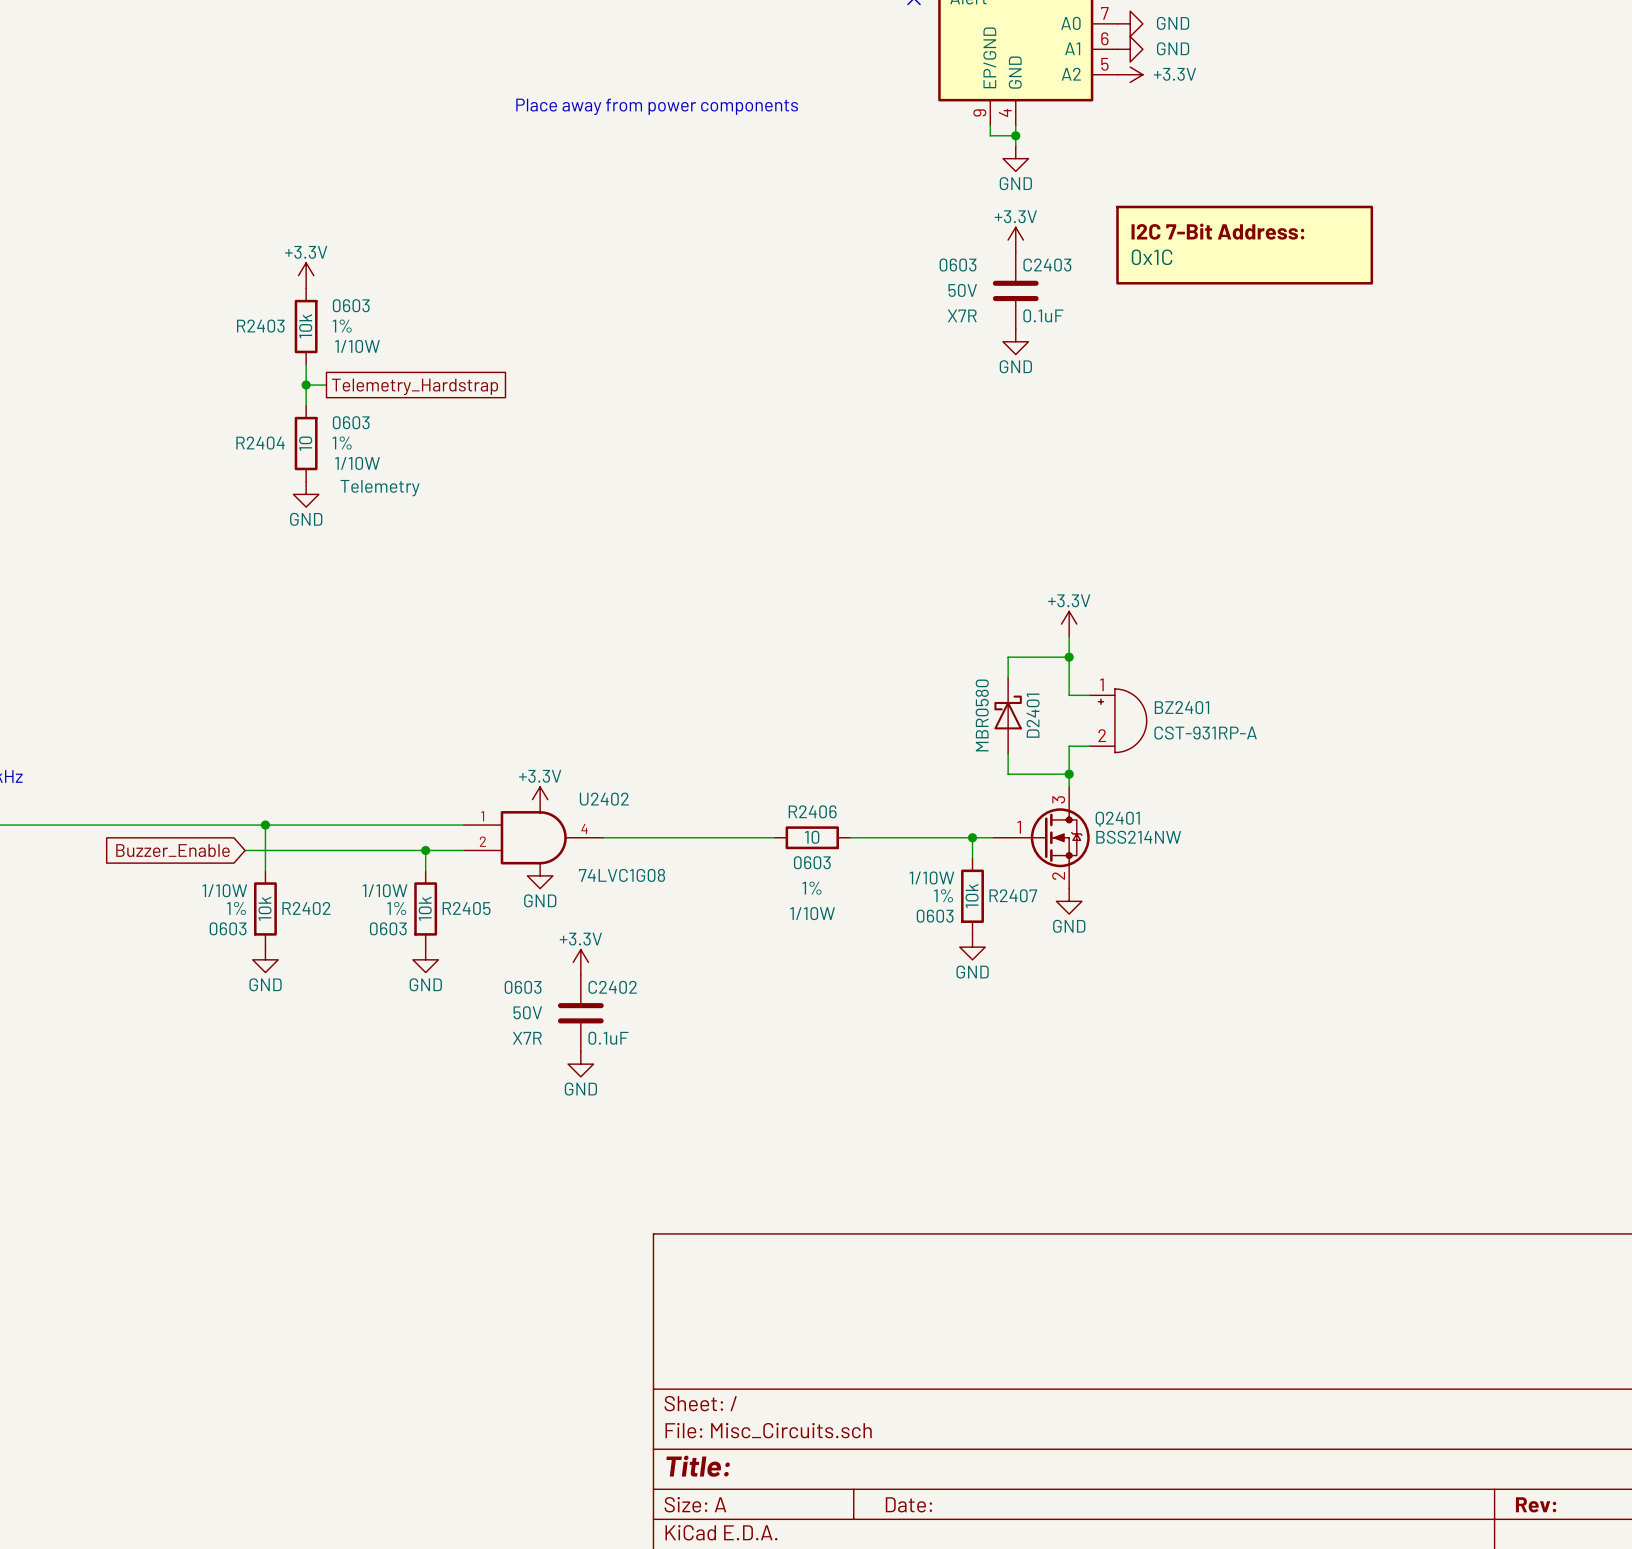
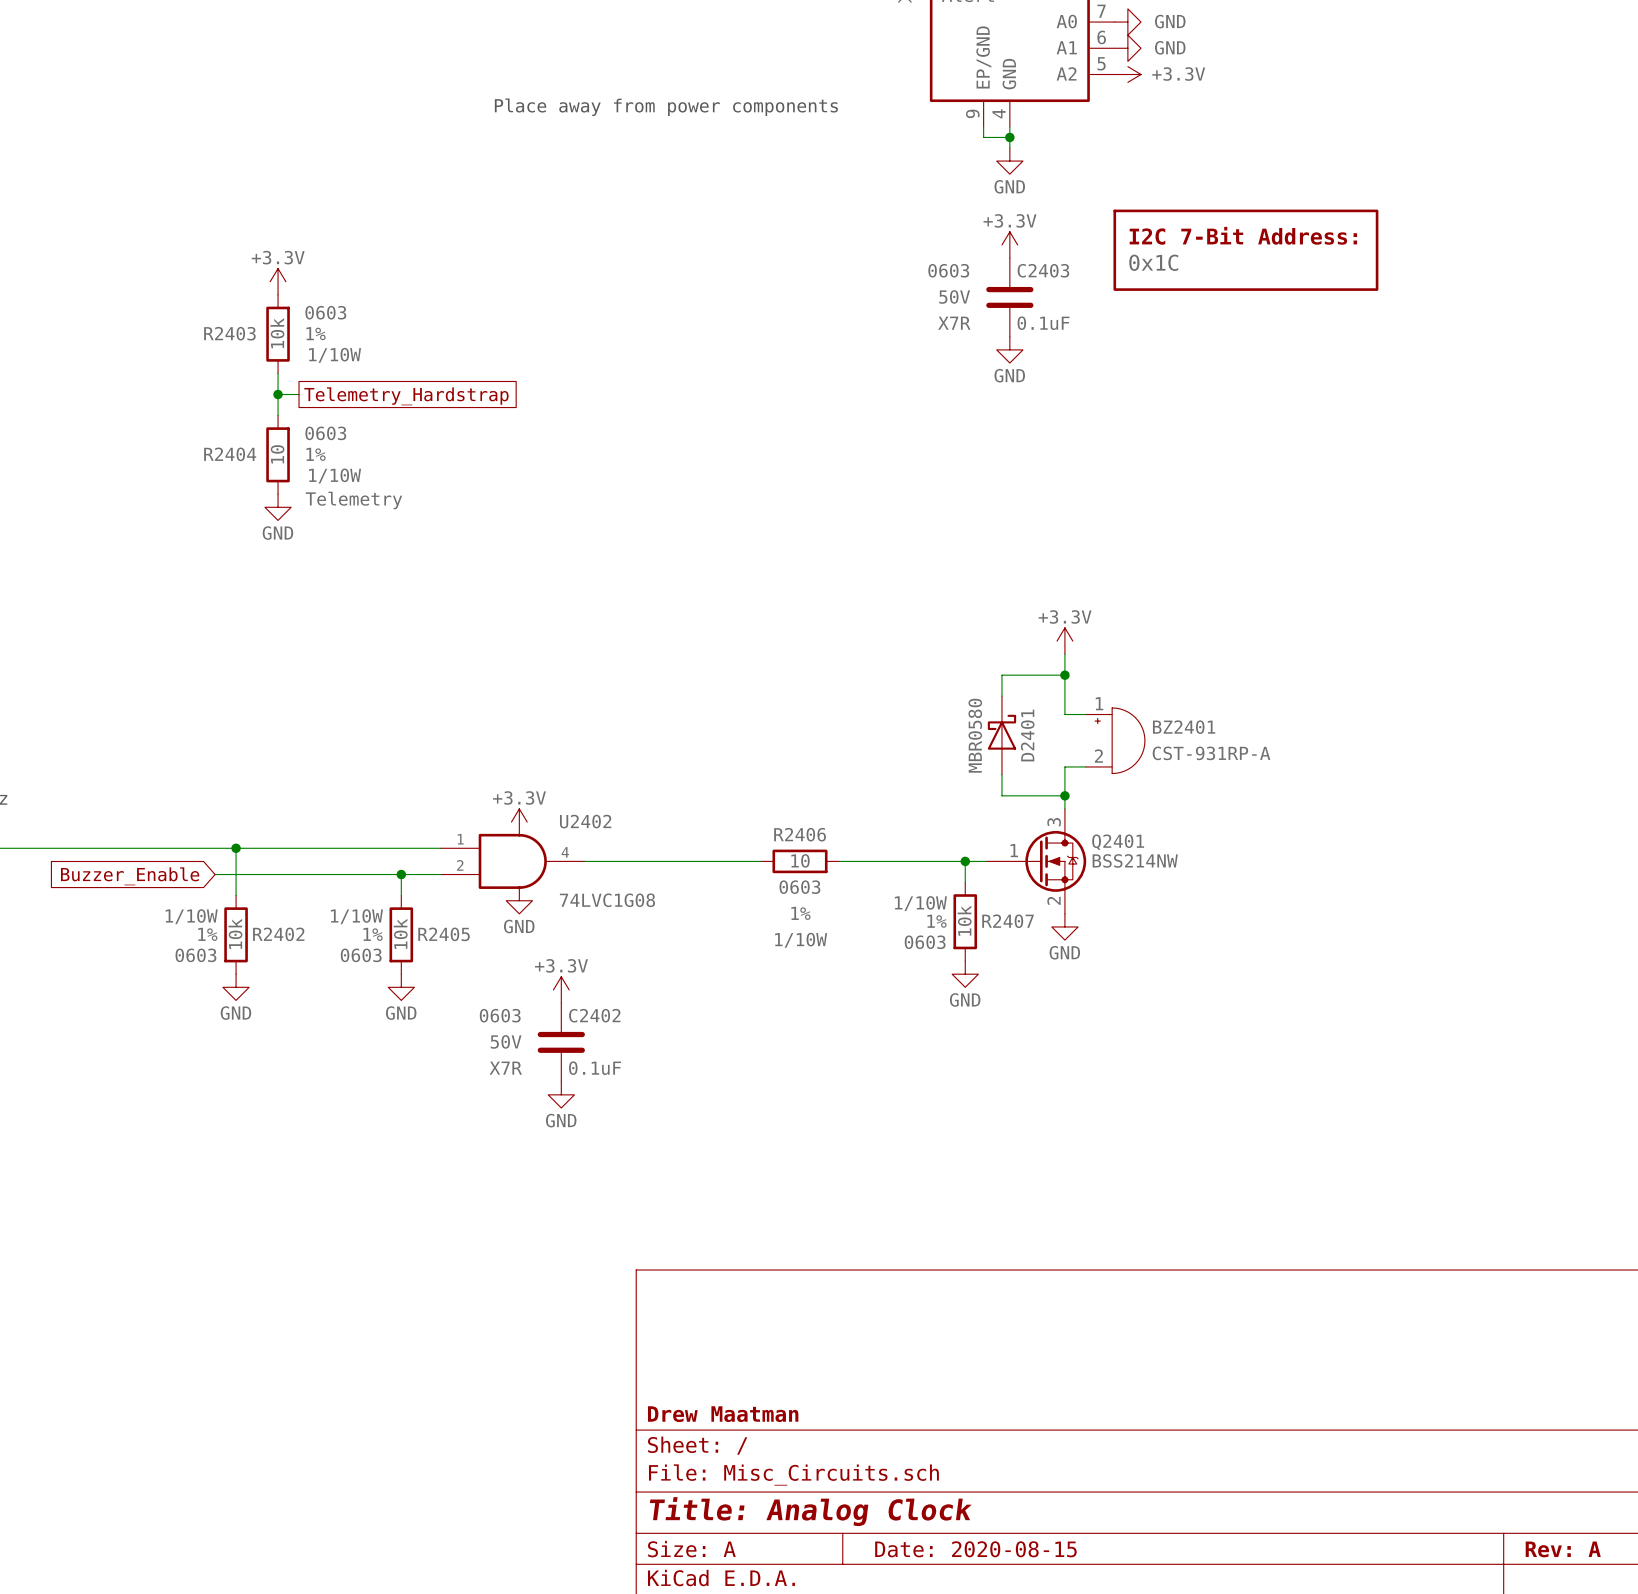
title block: none -> Drew Maatman (723, 1414)
title block: Title: (698, 1466) -> Title: Analog Clock (810, 1511)
title block: Date: (908, 1504) -> Date: 2020-08-15 (975, 1549)
title block: Rev: (1536, 1504) -> Rev: A (1563, 1549)

